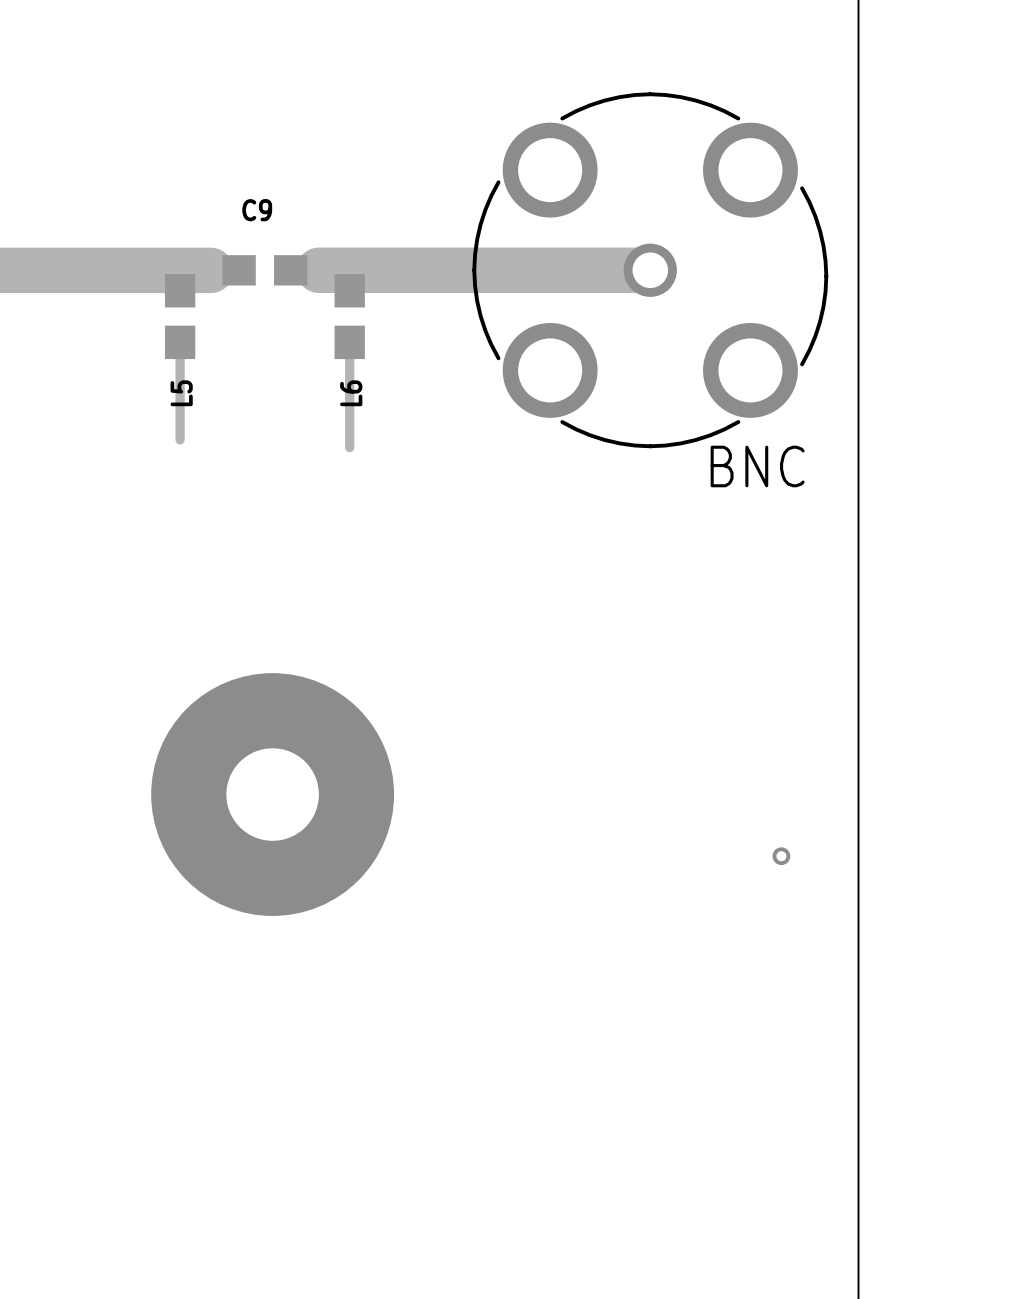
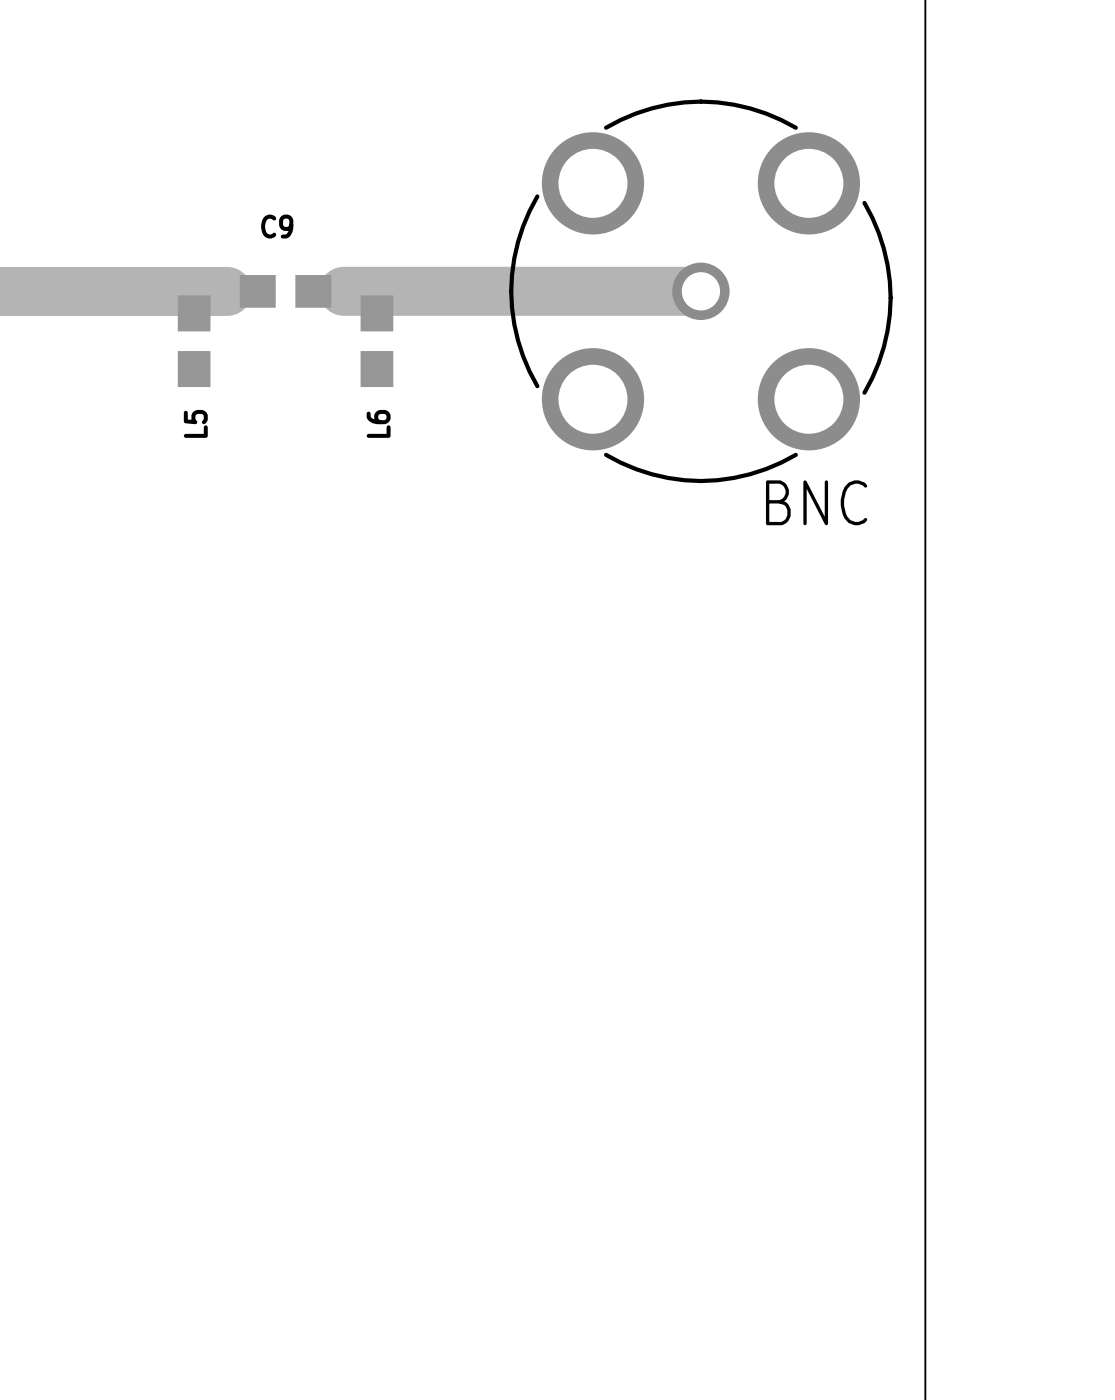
track: (180, 342) (180, 439) -> none
track: (349, 342) (349, 447) -> none
via: (272, 794) -> none
via: (781, 856) -> none

